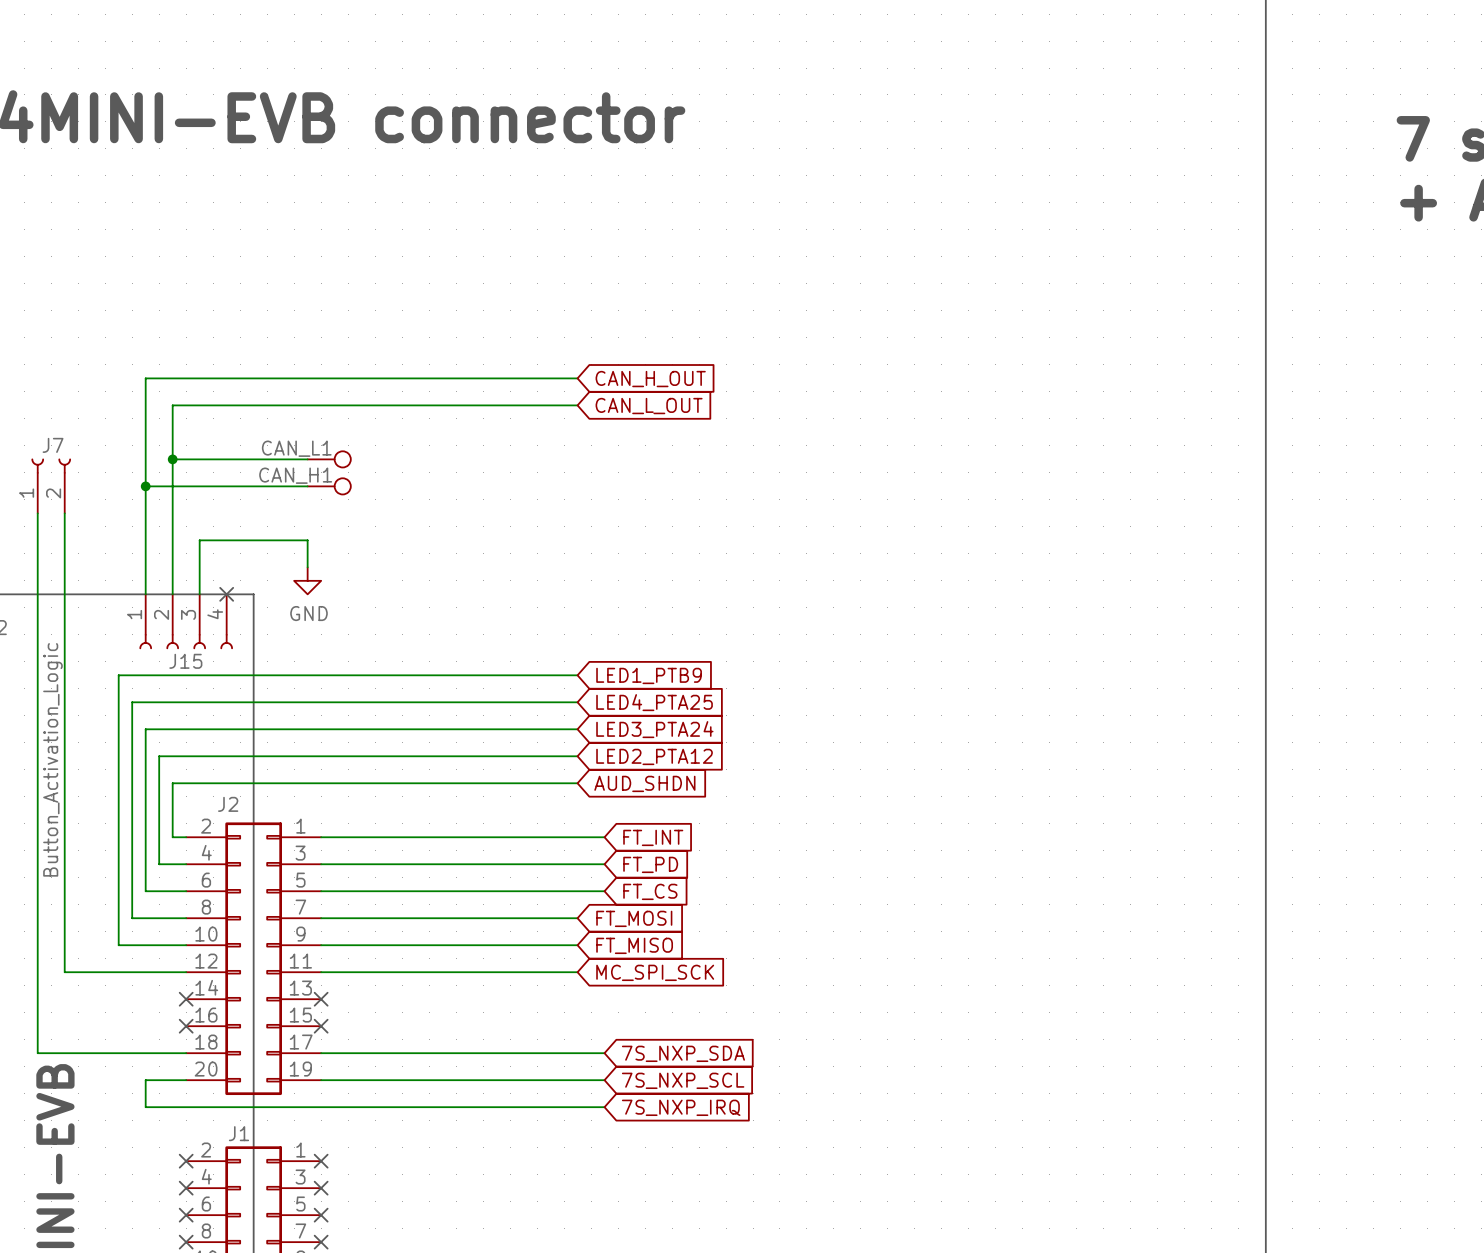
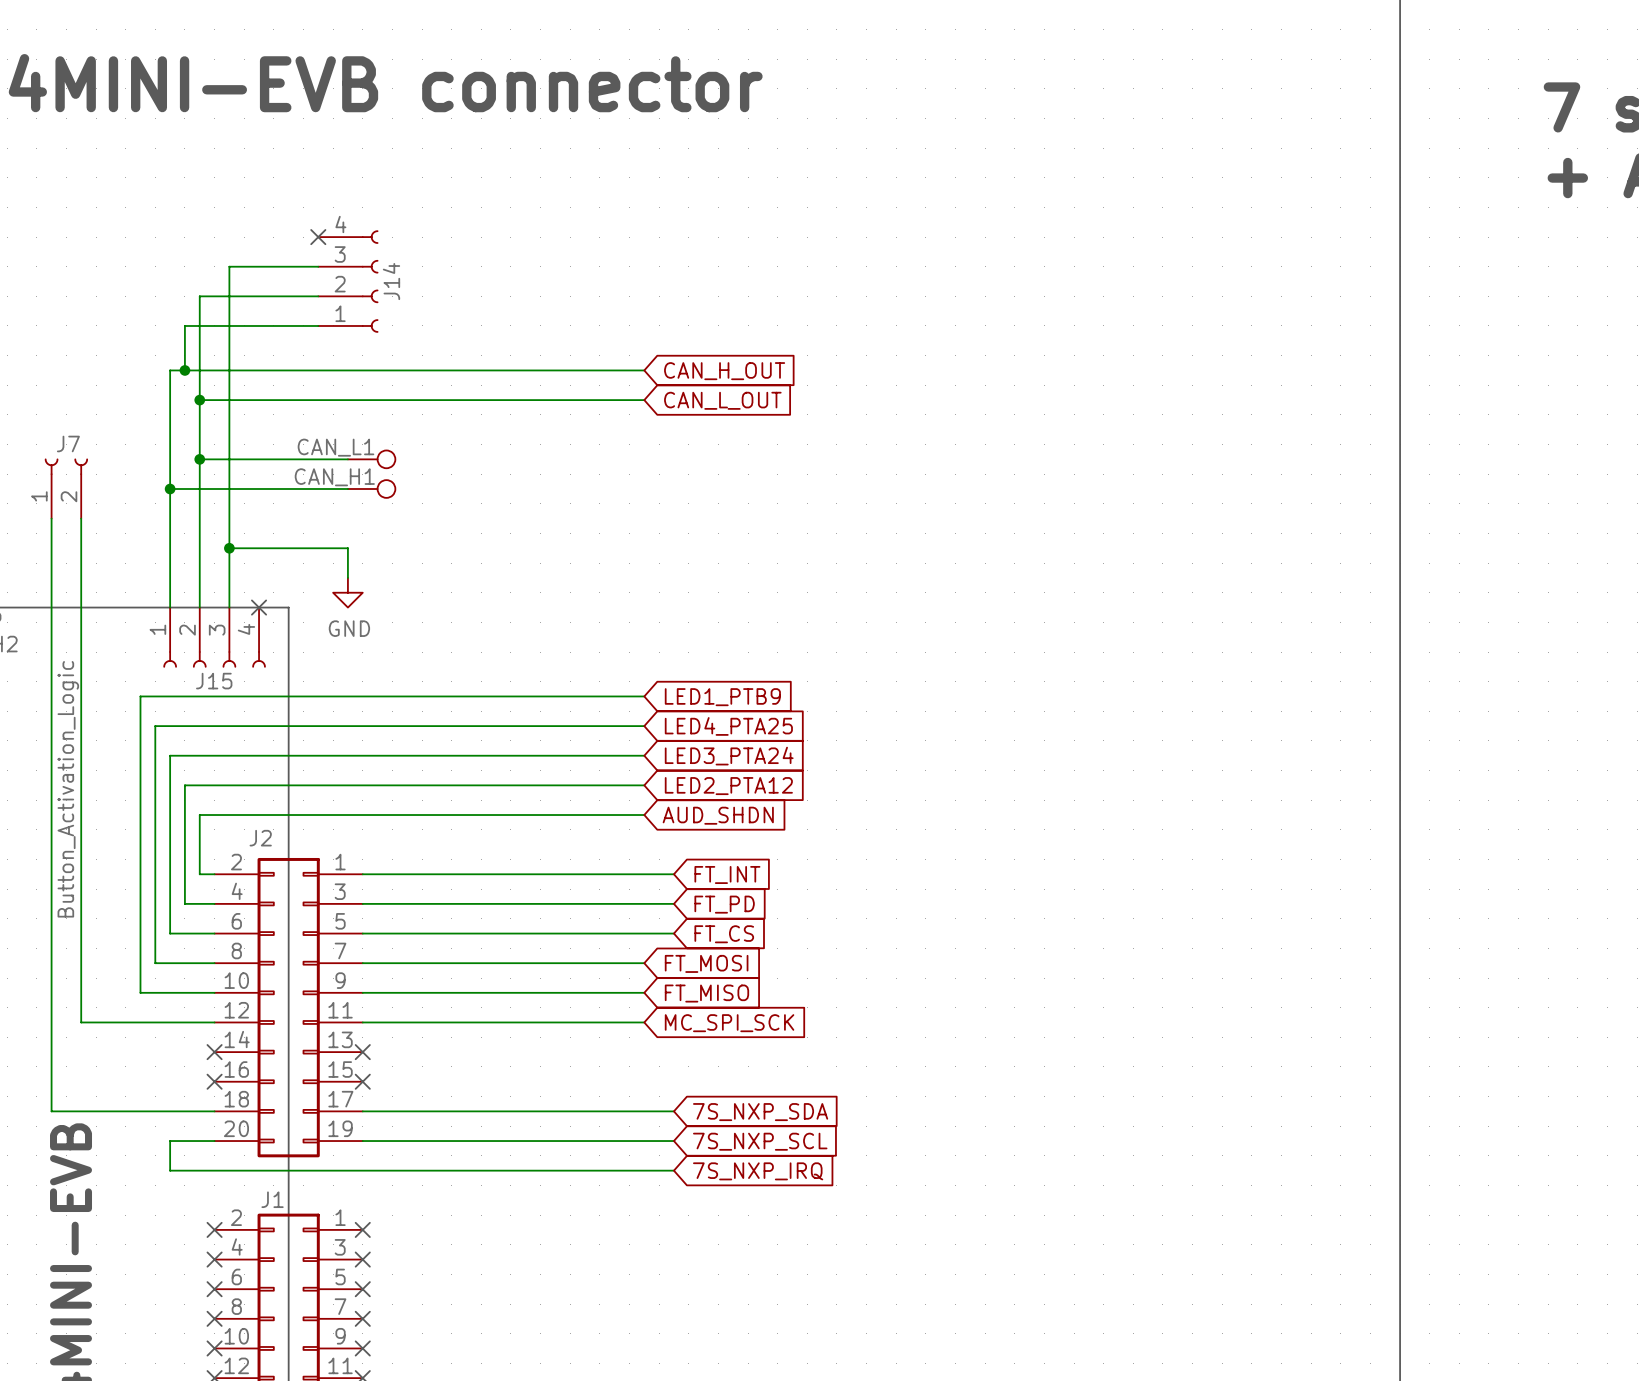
no-connect mark: none -> (318, 237)
wire: none -> (318, 266) (229, 266) (229, 548)
J14: none -> (348, 281)
wire: none -> (318, 296) (199, 296) (199, 400)
wire: none -> (318, 325) (184, 325) (184, 370)
junction: none -> (184, 370)
junction: none -> (199, 400)
junction: none -> (229, 548)

